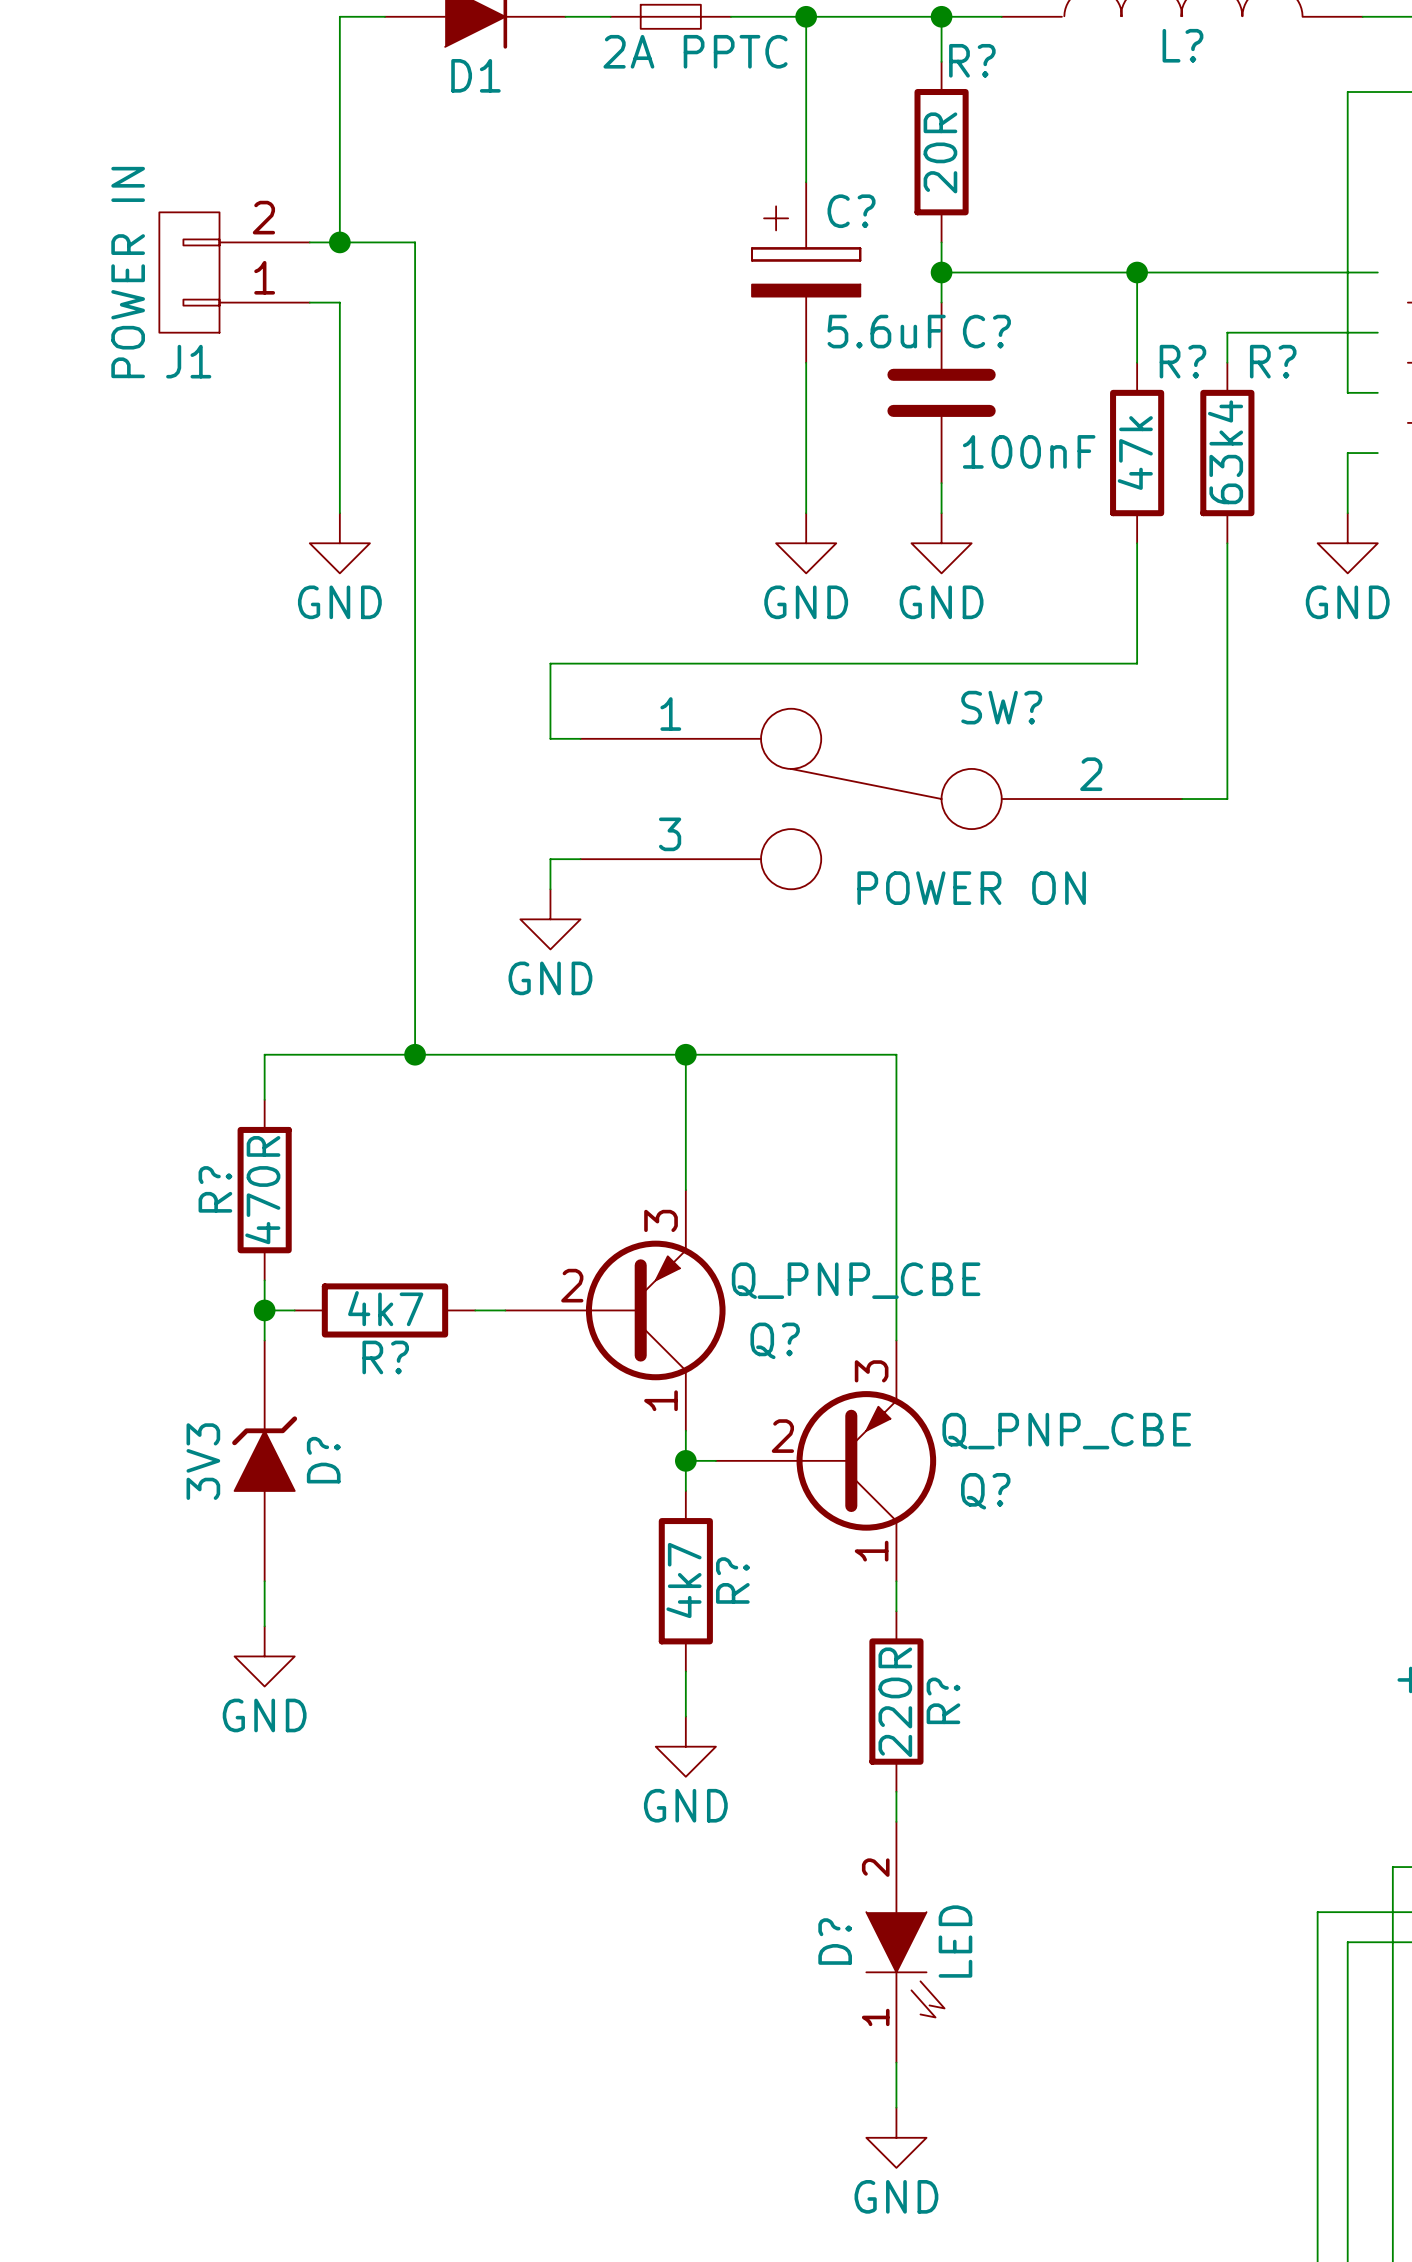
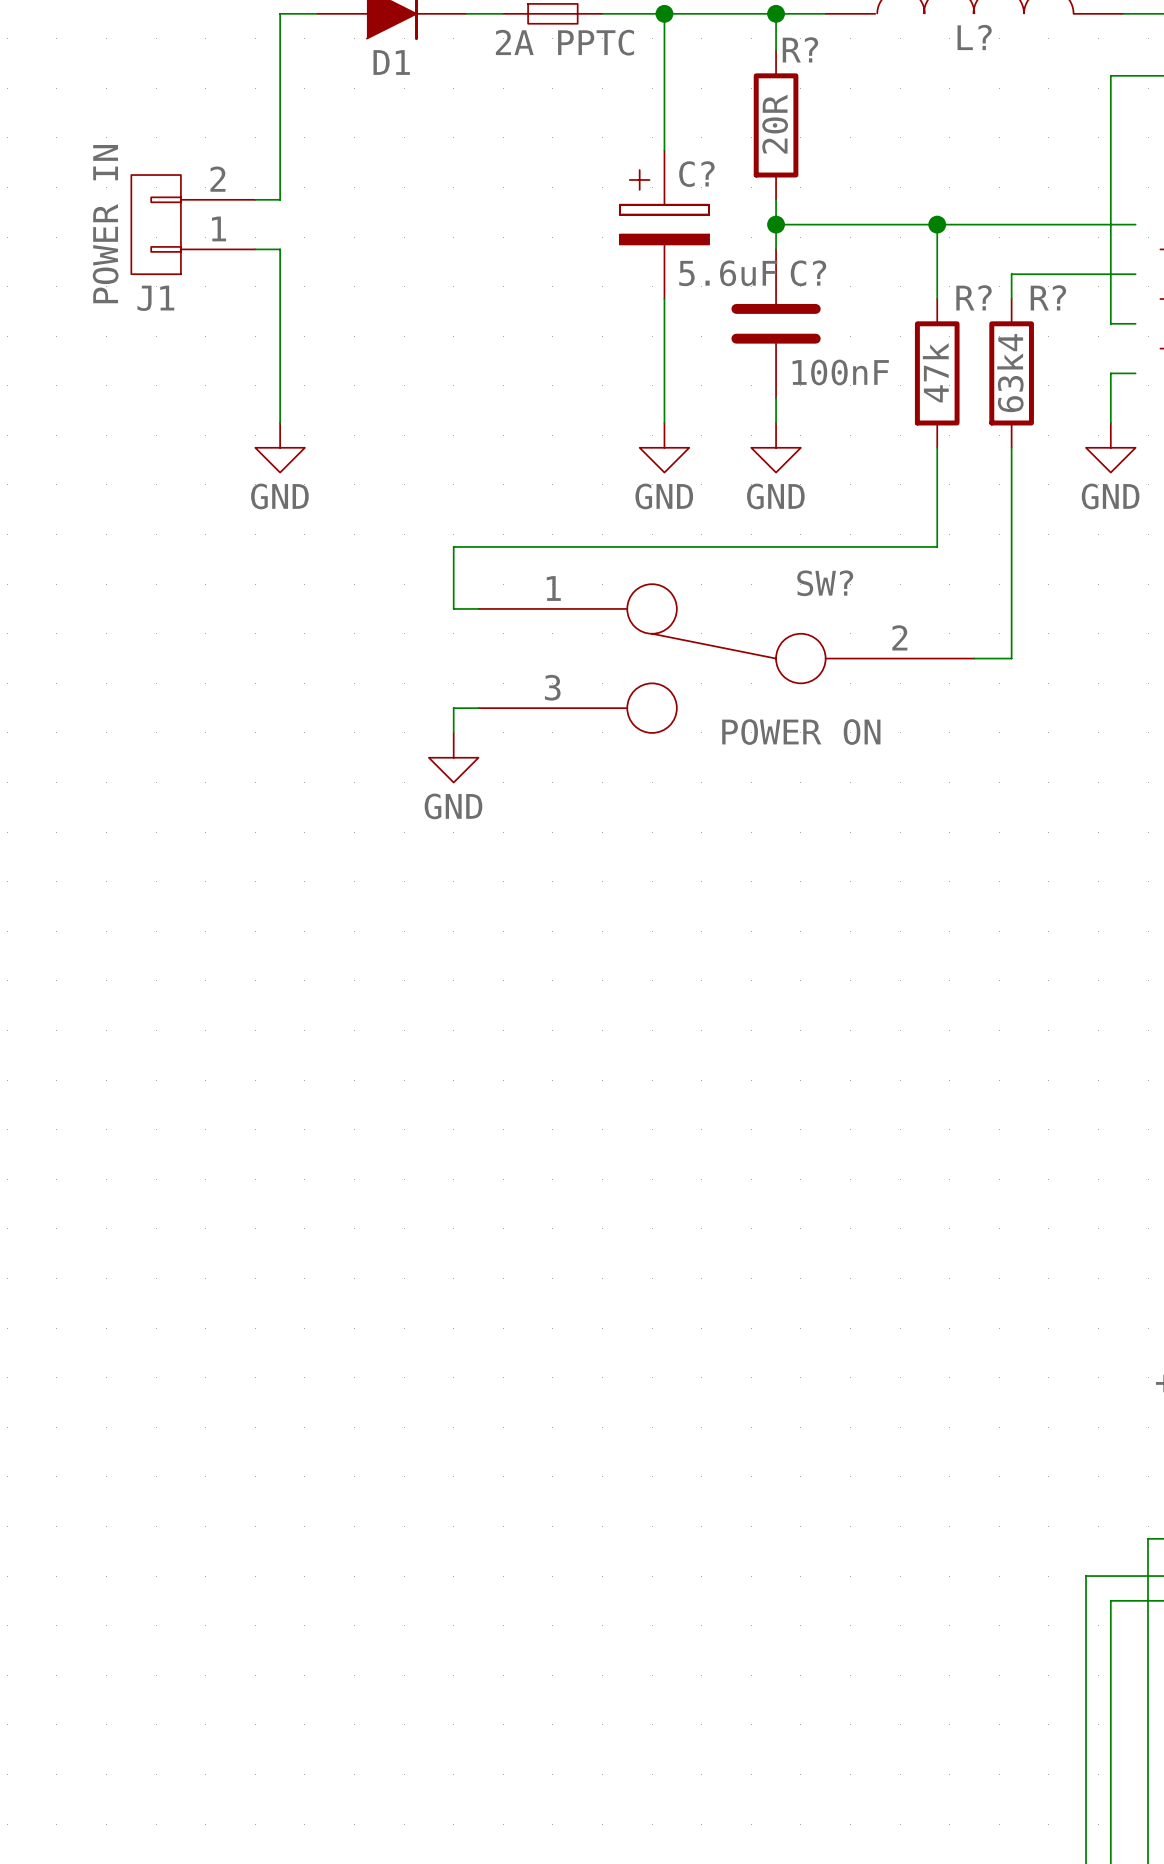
wire: (339, 242) (415, 242) (415, 1054) -> none
junction: (339, 242) -> none
junction: (415, 1054) -> none
wire: (685, 1054) (685, 1190) -> none
junction: (685, 1054) -> none
wire: (264, 1099) (264, 1054) (896, 1054) (896, 1340) -> none
R?: 470R (264, 1190) -> none
wire: (264, 1280) (264, 1340) -> none
wire: (264, 1310) (294, 1310) -> none
junction: (264, 1310) -> none
R?: 4k7 (384, 1310) -> none
wire: (475, 1310) (505, 1310) -> none
Q?: Q_PNP_CBE (615, 1310) -> none
wire: (685, 1430) (685, 1490) -> none
D?: 3V3 (264, 1460) -> none
wire: (685, 1460) (715, 1460) -> none
junction: (685, 1460) -> none
Q?: Q_PNP_CBE (826, 1460) -> none
wire: (264, 1581) (264, 1626) -> none
R?: 4k7 (685, 1581) -> none
wire: (896, 1581) (896, 1611) -> none
power symbol: GND (264, 1656) -> none
wire: (685, 1671) (685, 1716) -> none
R?: 220R (896, 1701) -> none
power symbol: GND (685, 1746) -> none
wire: (896, 1791) (896, 1821) -> none
D?: LED (905, 1942) -> none
wire: (896, 2062) (896, 2107) -> none
power symbol: GND (896, 2137) -> none

